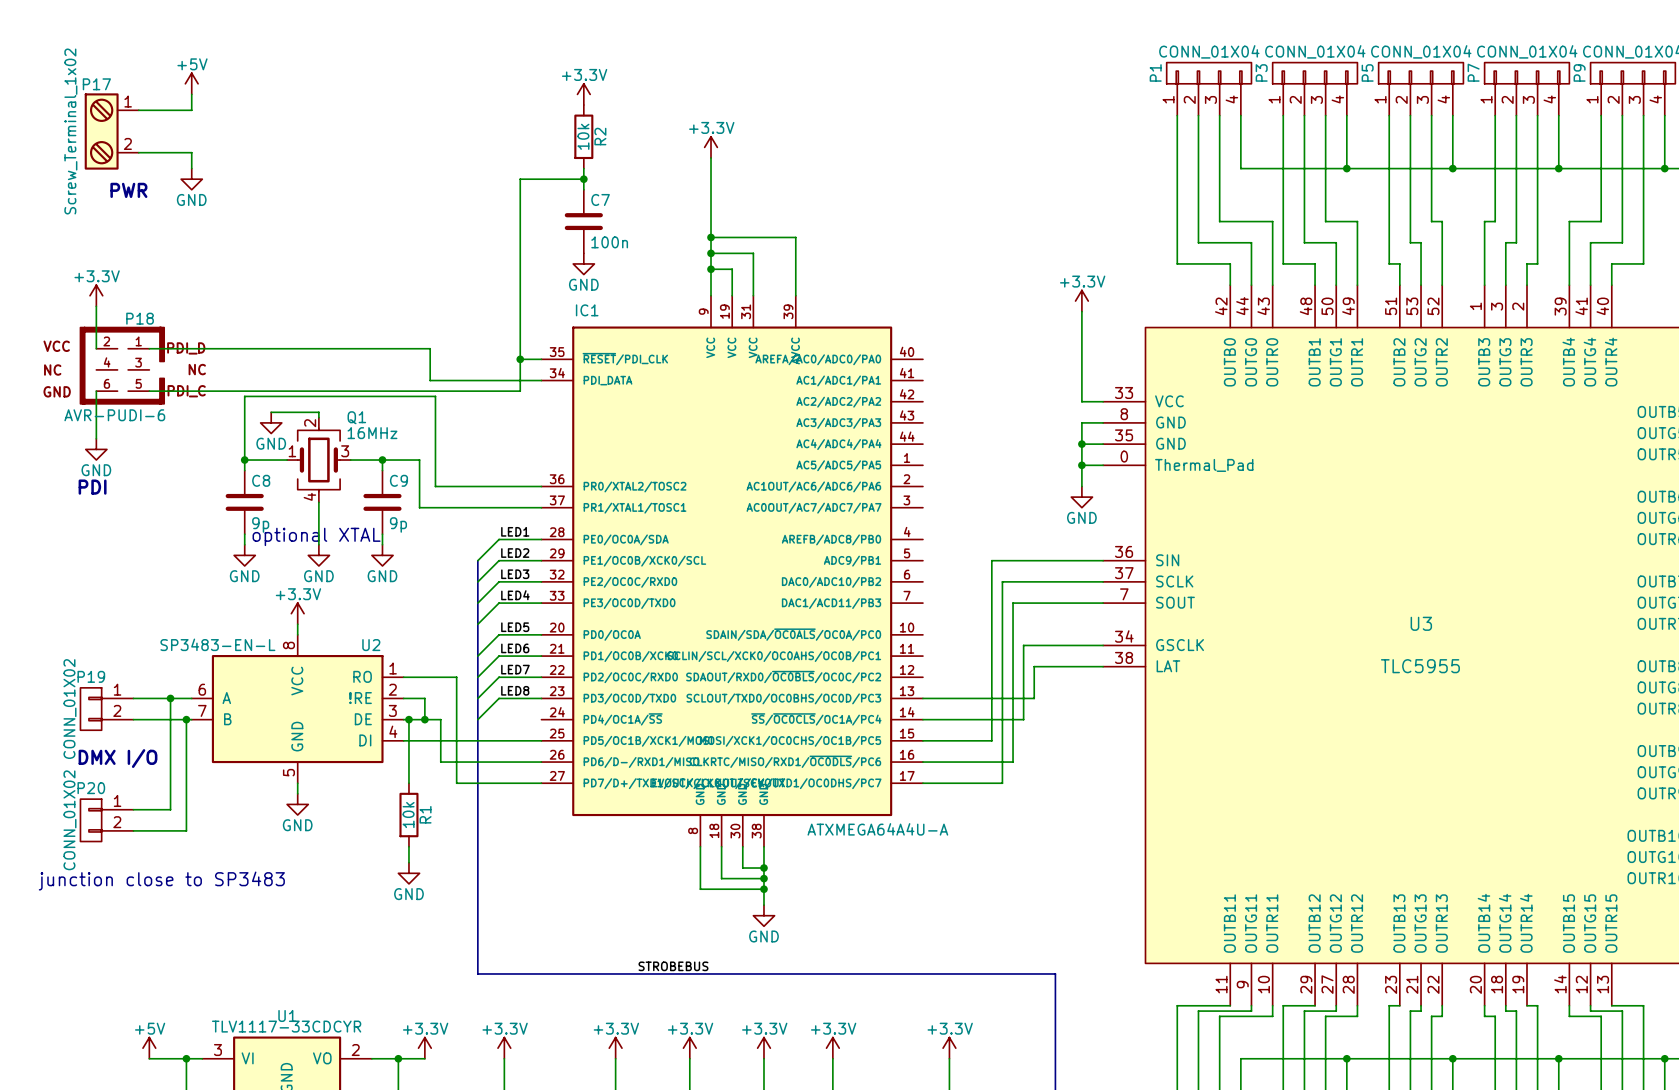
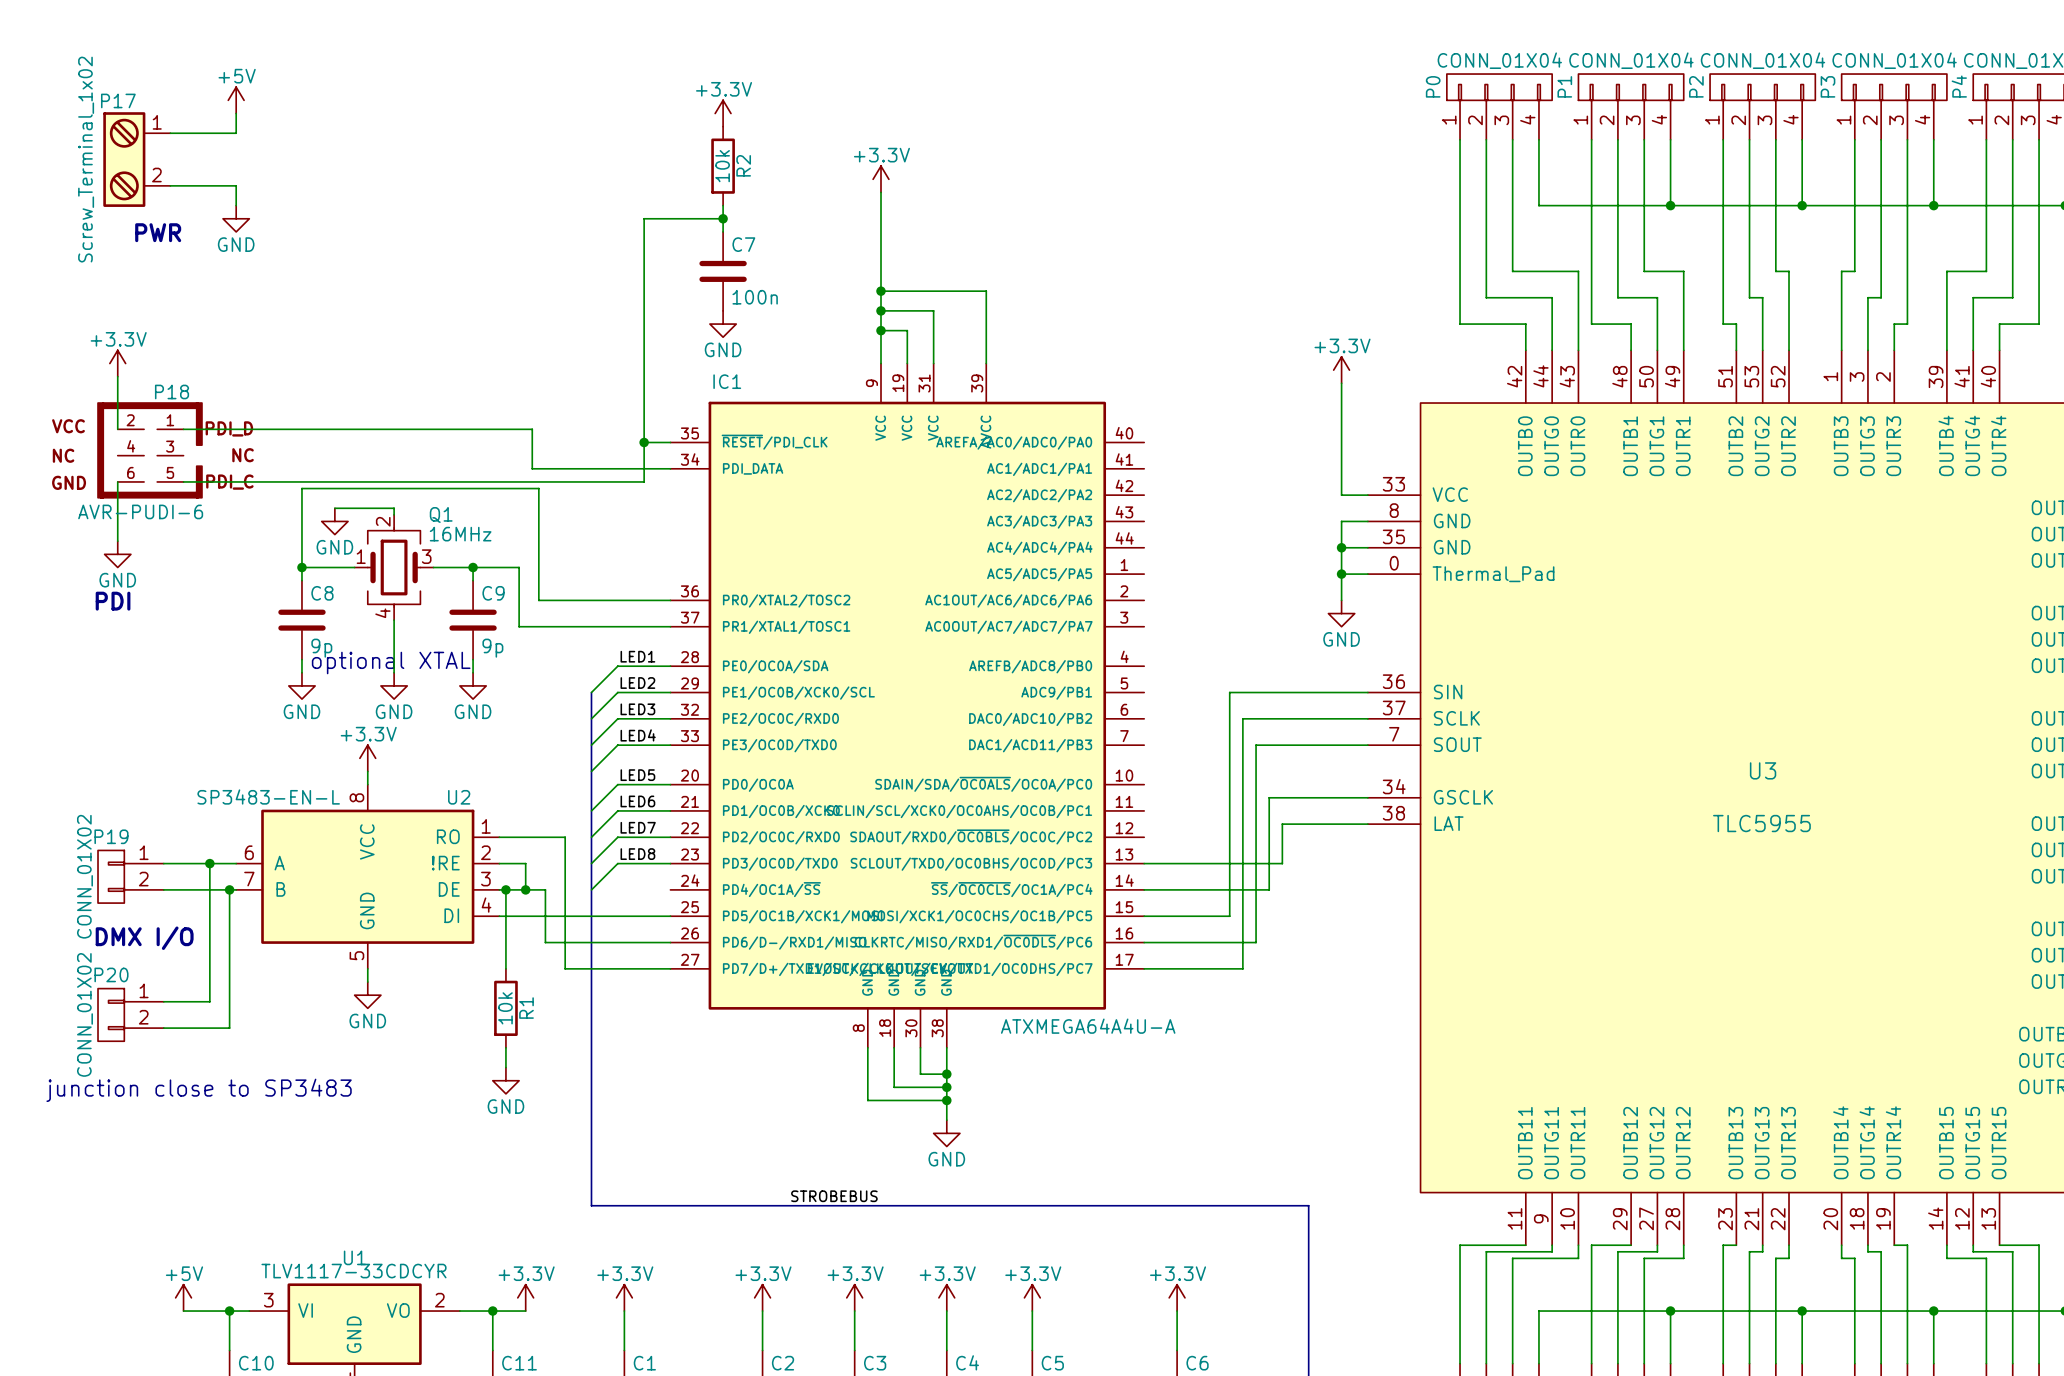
P1 name: P1 (1155, 72) -> P0 (1433, 86)
P3 name: P3 (1261, 72) -> P1 (1564, 86)
P5 name: P5 (1367, 72) -> P2 (1696, 86)
P7 name: P7 (1473, 72) -> P3 (1827, 86)
P9 name: P9 (1579, 72) -> P4 (1959, 86)

